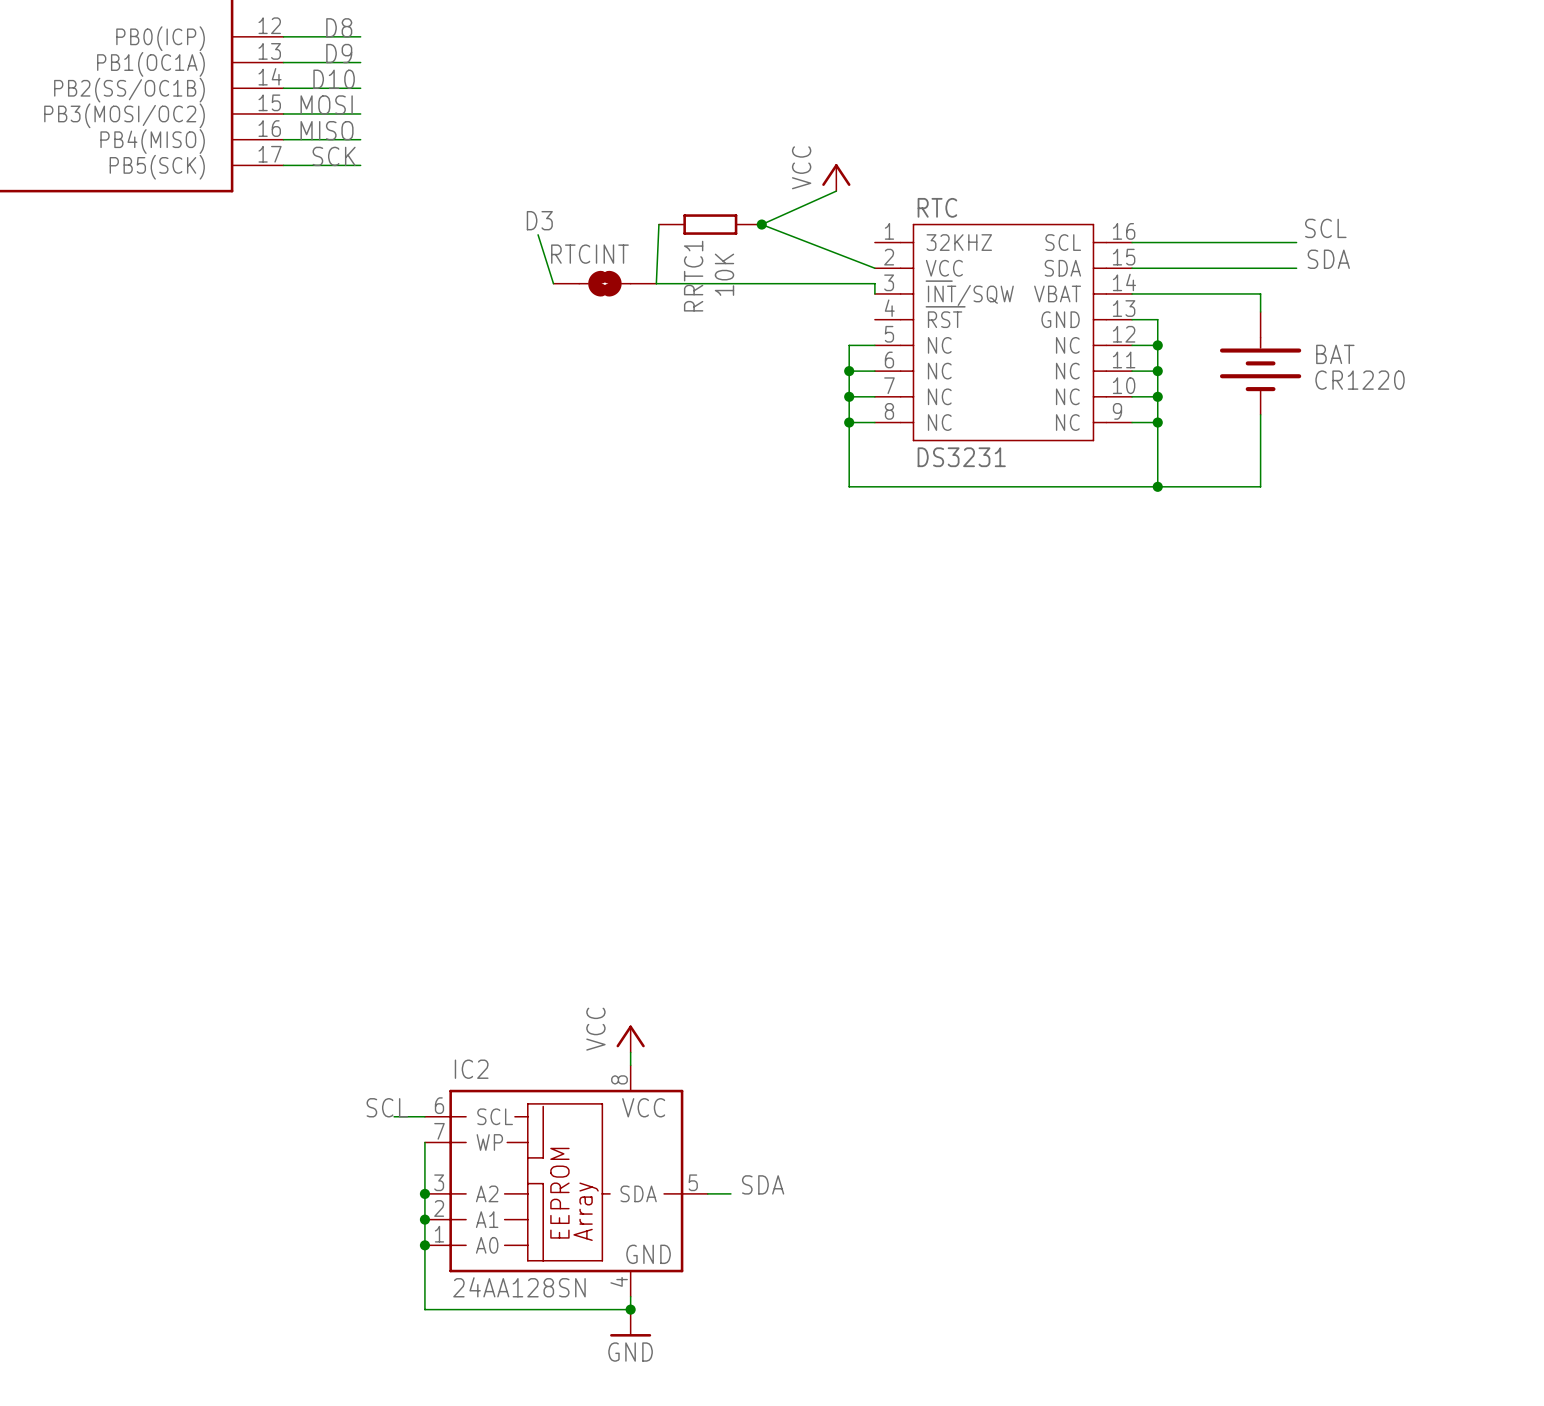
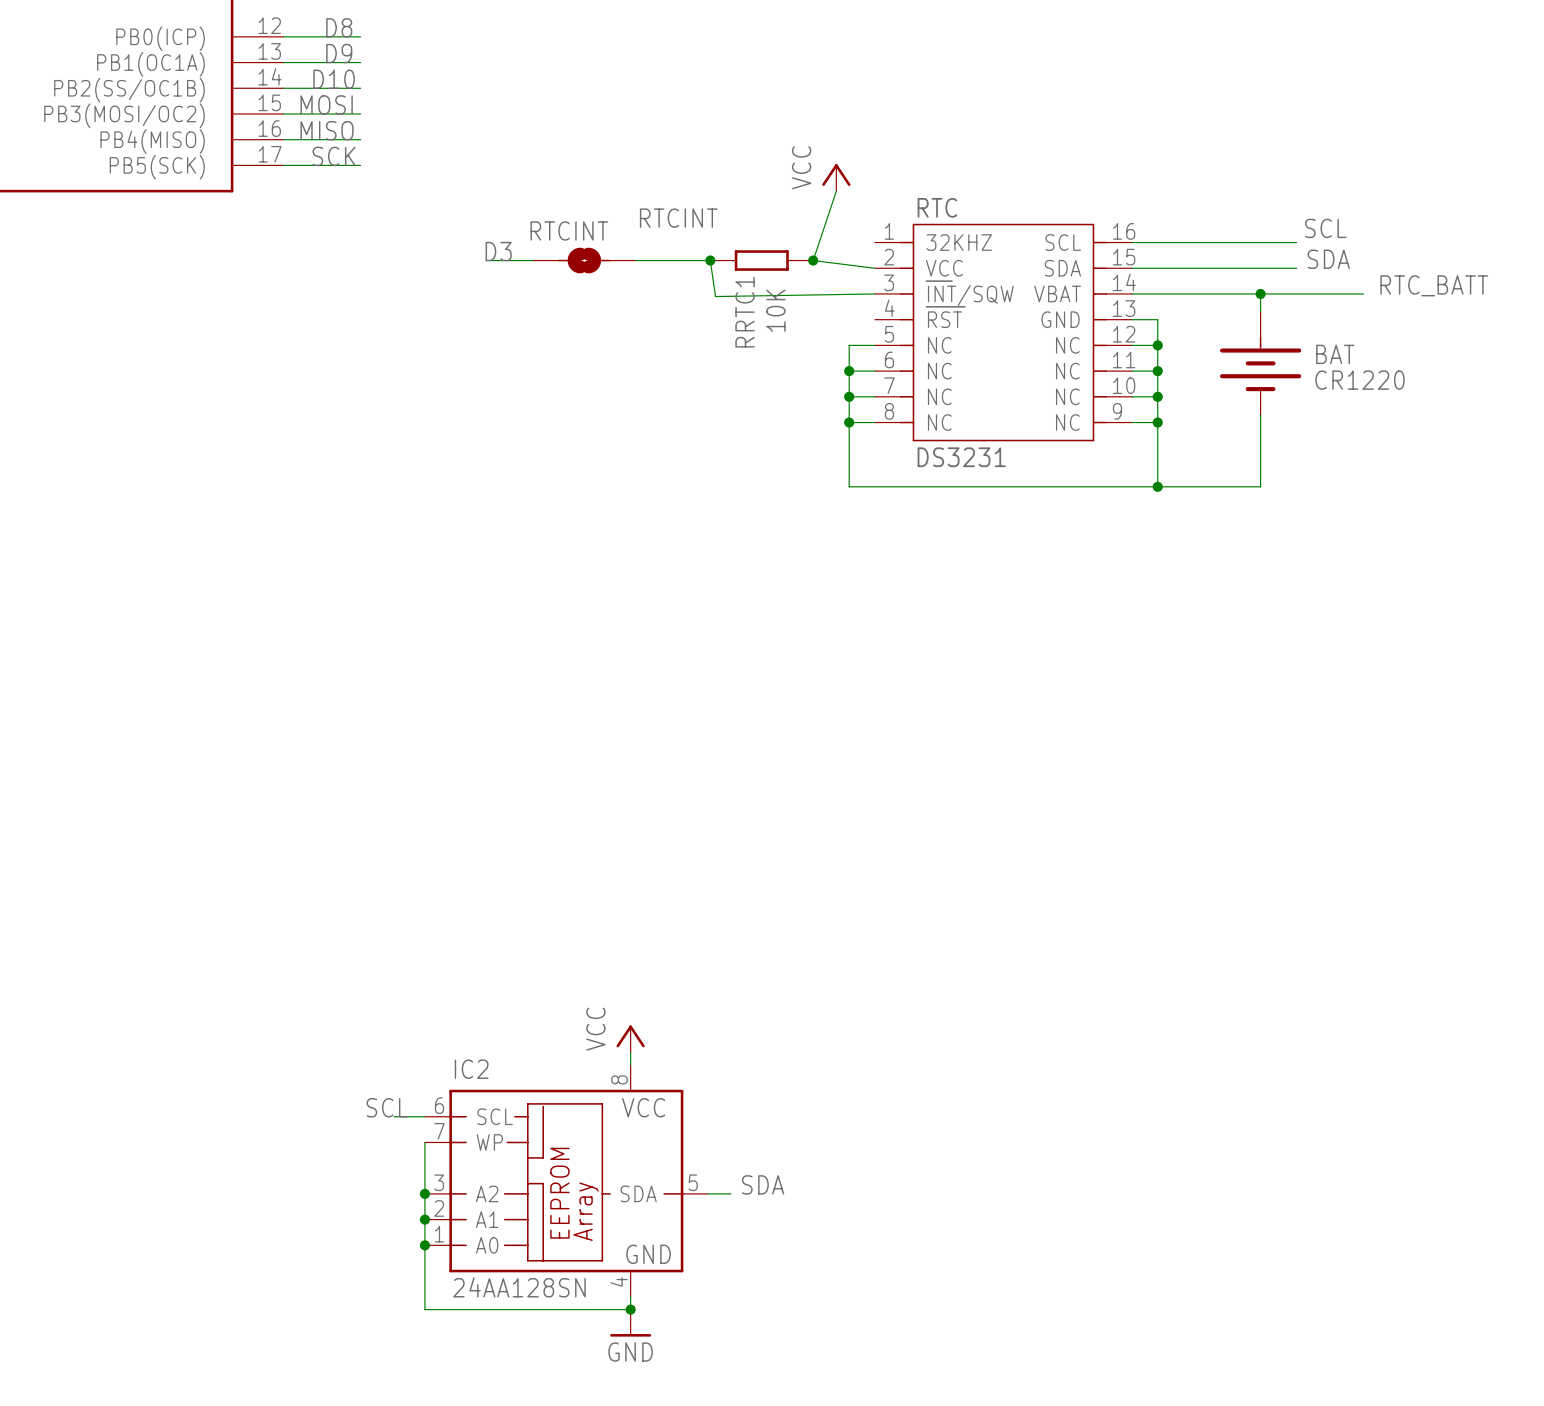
wire: (836, 191) (761, 224) (874, 268) -> (836, 191) (813, 260) (874, 268)
label: none -> RTCINT (678, 218)
label position: D3 (539, 220) -> D3 (498, 251)
wire: (658, 224) (656, 283) (874, 283) (874, 293) -> (635, 260) (710, 260) (715, 296) (874, 293)
RRTC1 position: (710, 224) -> (761, 260)
junction: (761, 224) -> none
wire: (538, 234) (553, 283) -> none
wire: none -> (489, 260) (532, 260)
junction: none -> (710, 260)
junction: none -> (813, 260)
RTCINT position: (604, 283) -> (584, 260)
label: none -> RTC_BATT (1434, 285)
wire: none -> (1260, 293) (1363, 293)
junction: none -> (1260, 293)

